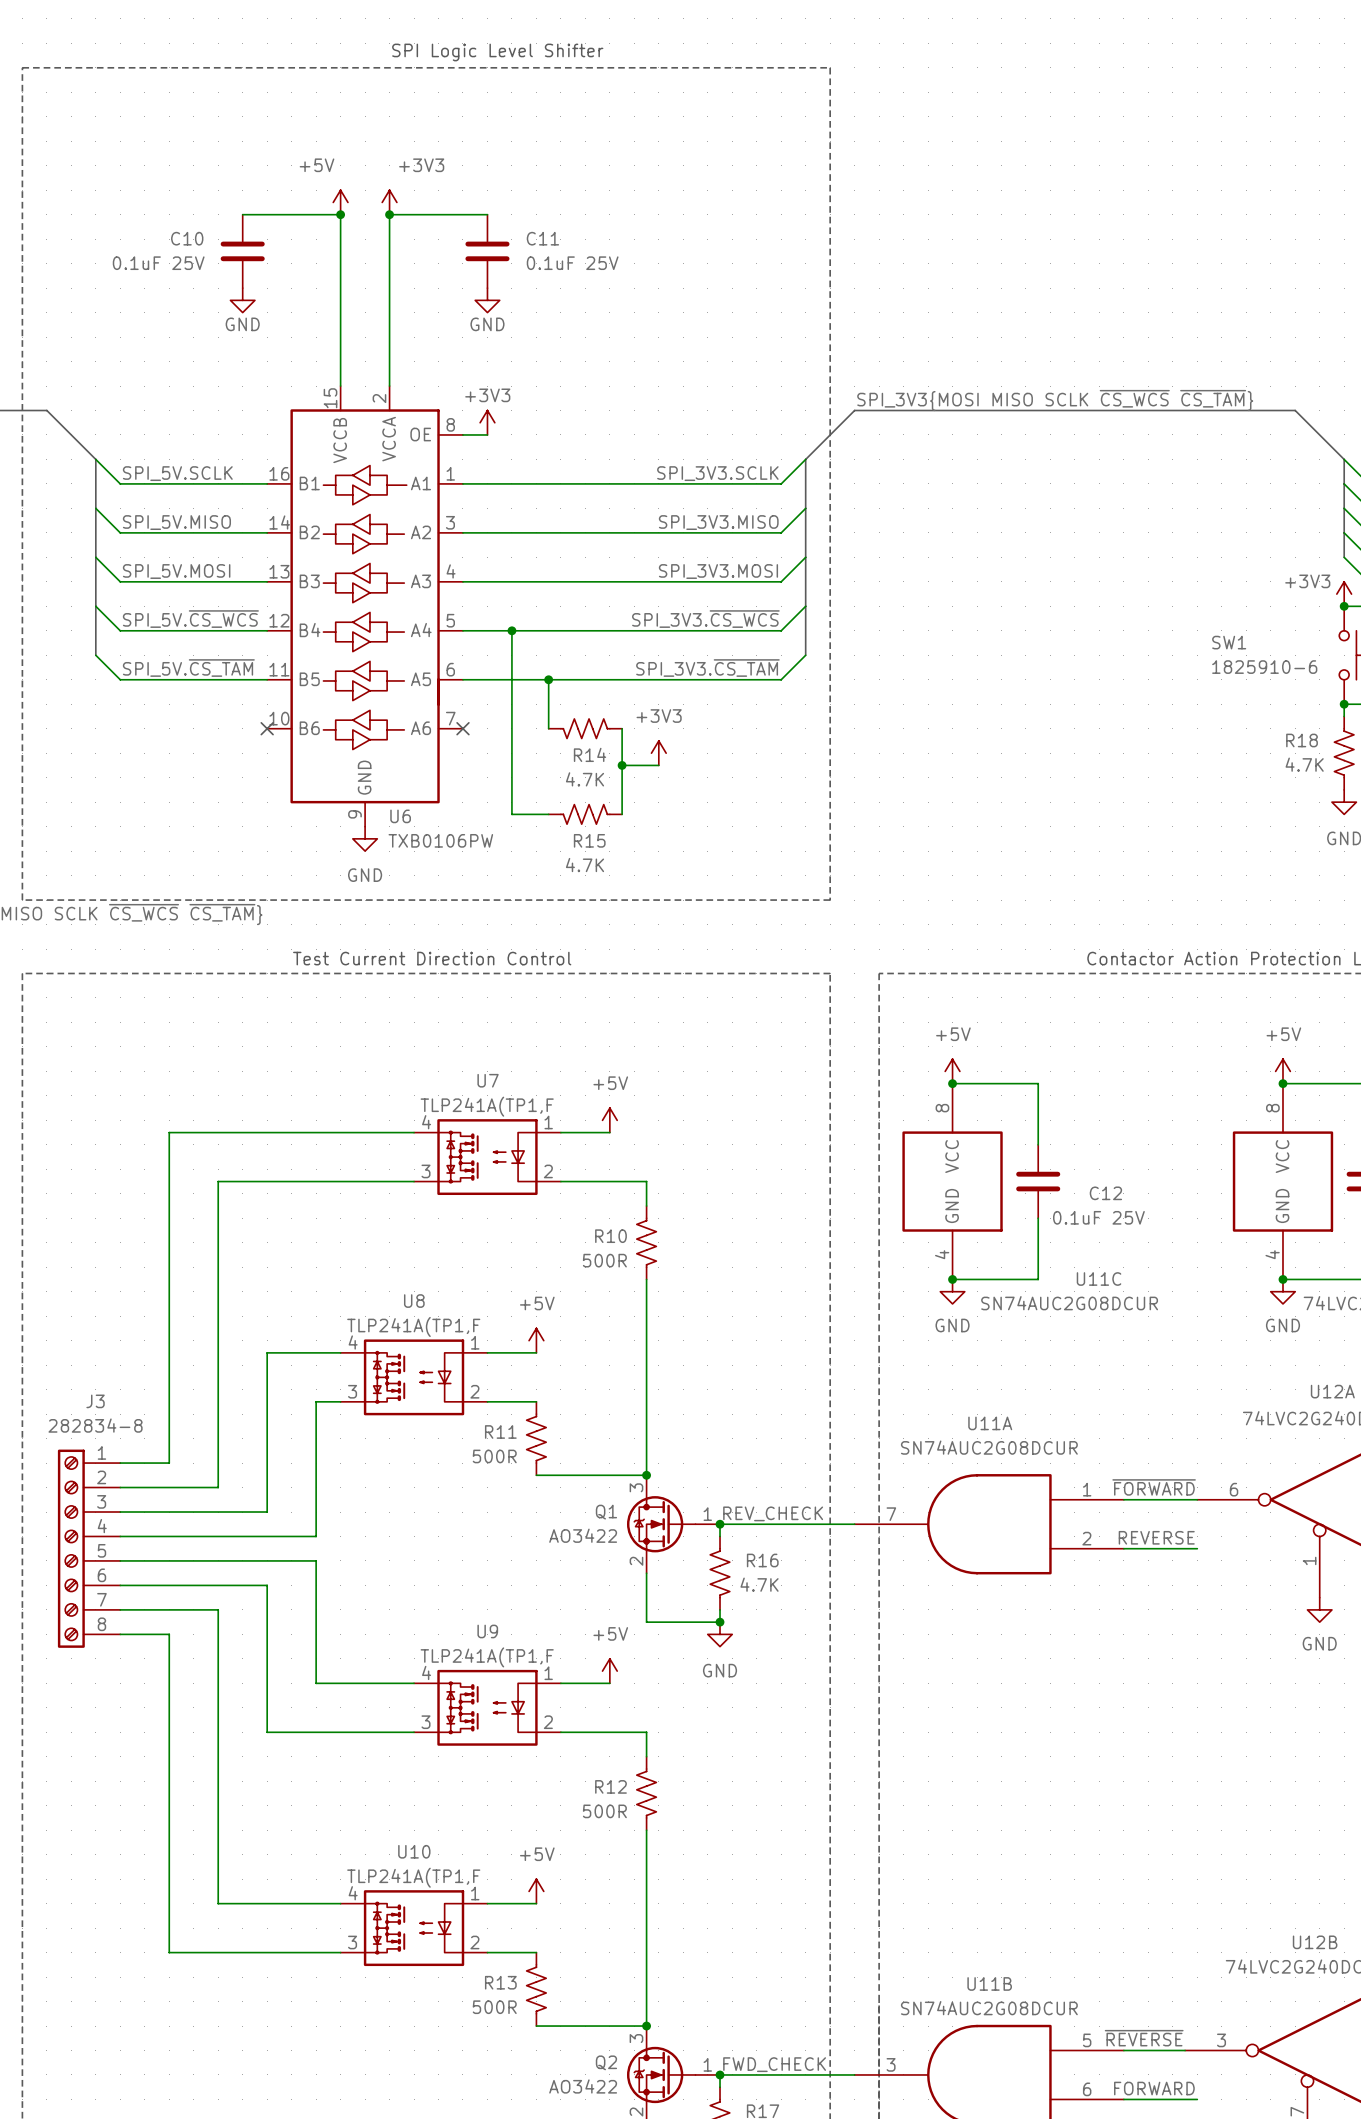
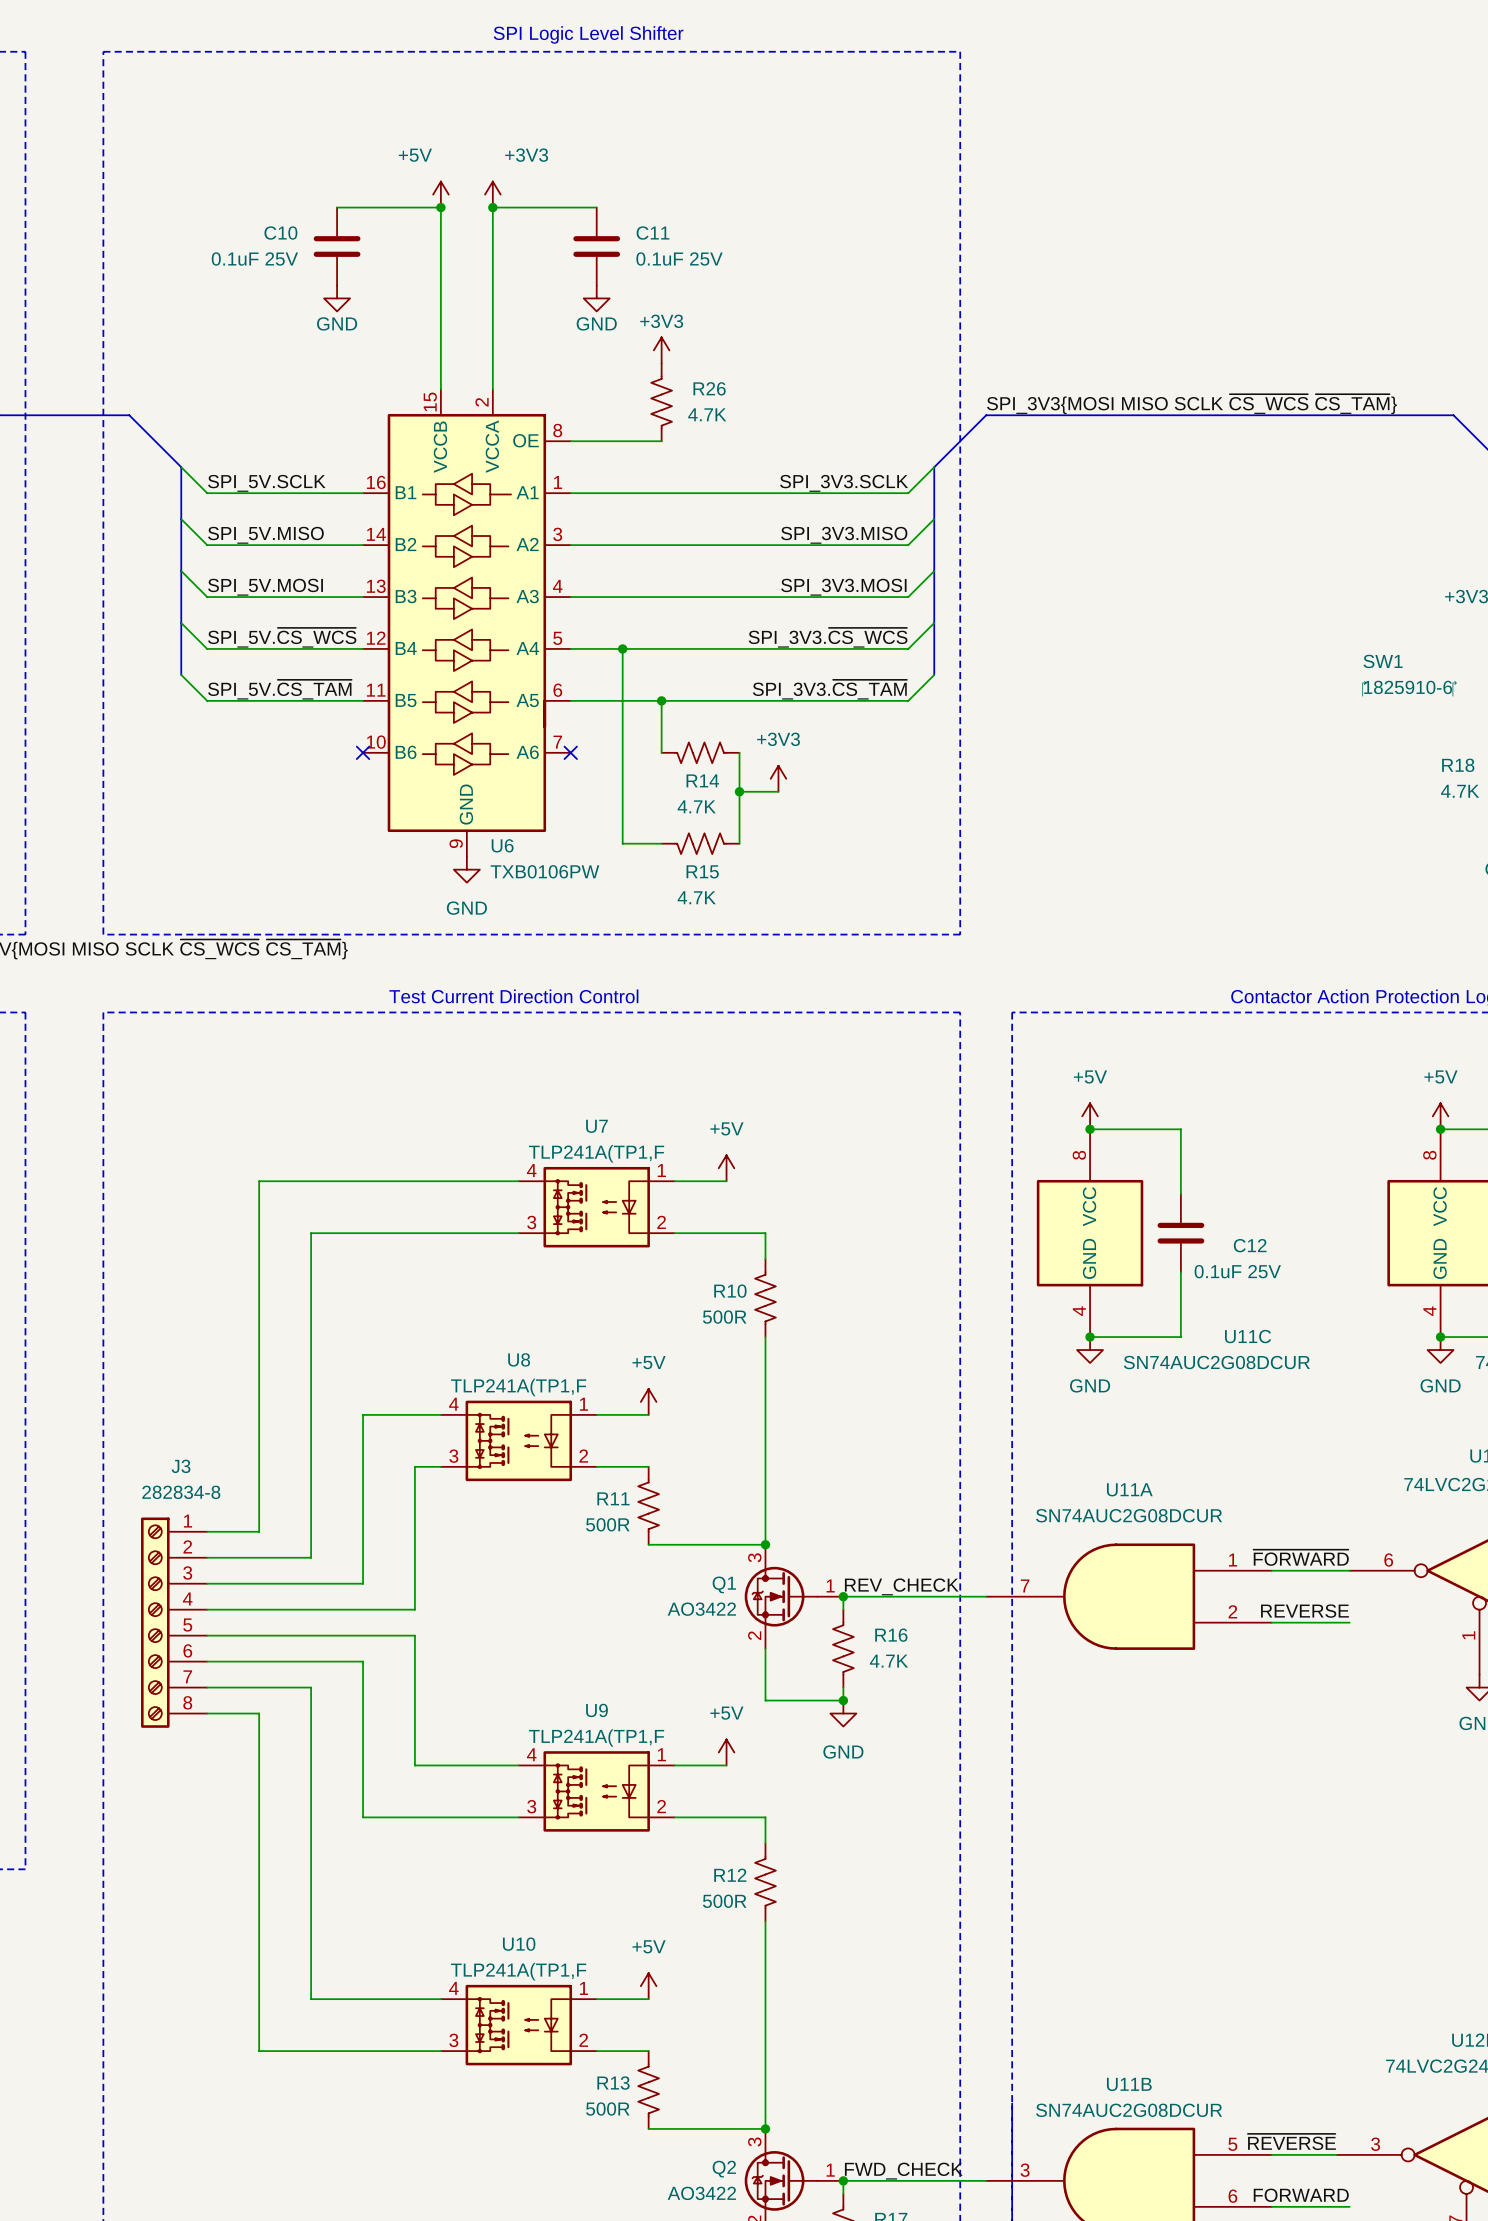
R26: none -> 4.7K (661, 402)
power symbol position: +3V3 (487, 422) -> +3V3 (661, 350)
wire: none -> (596, 441) (661, 441)

